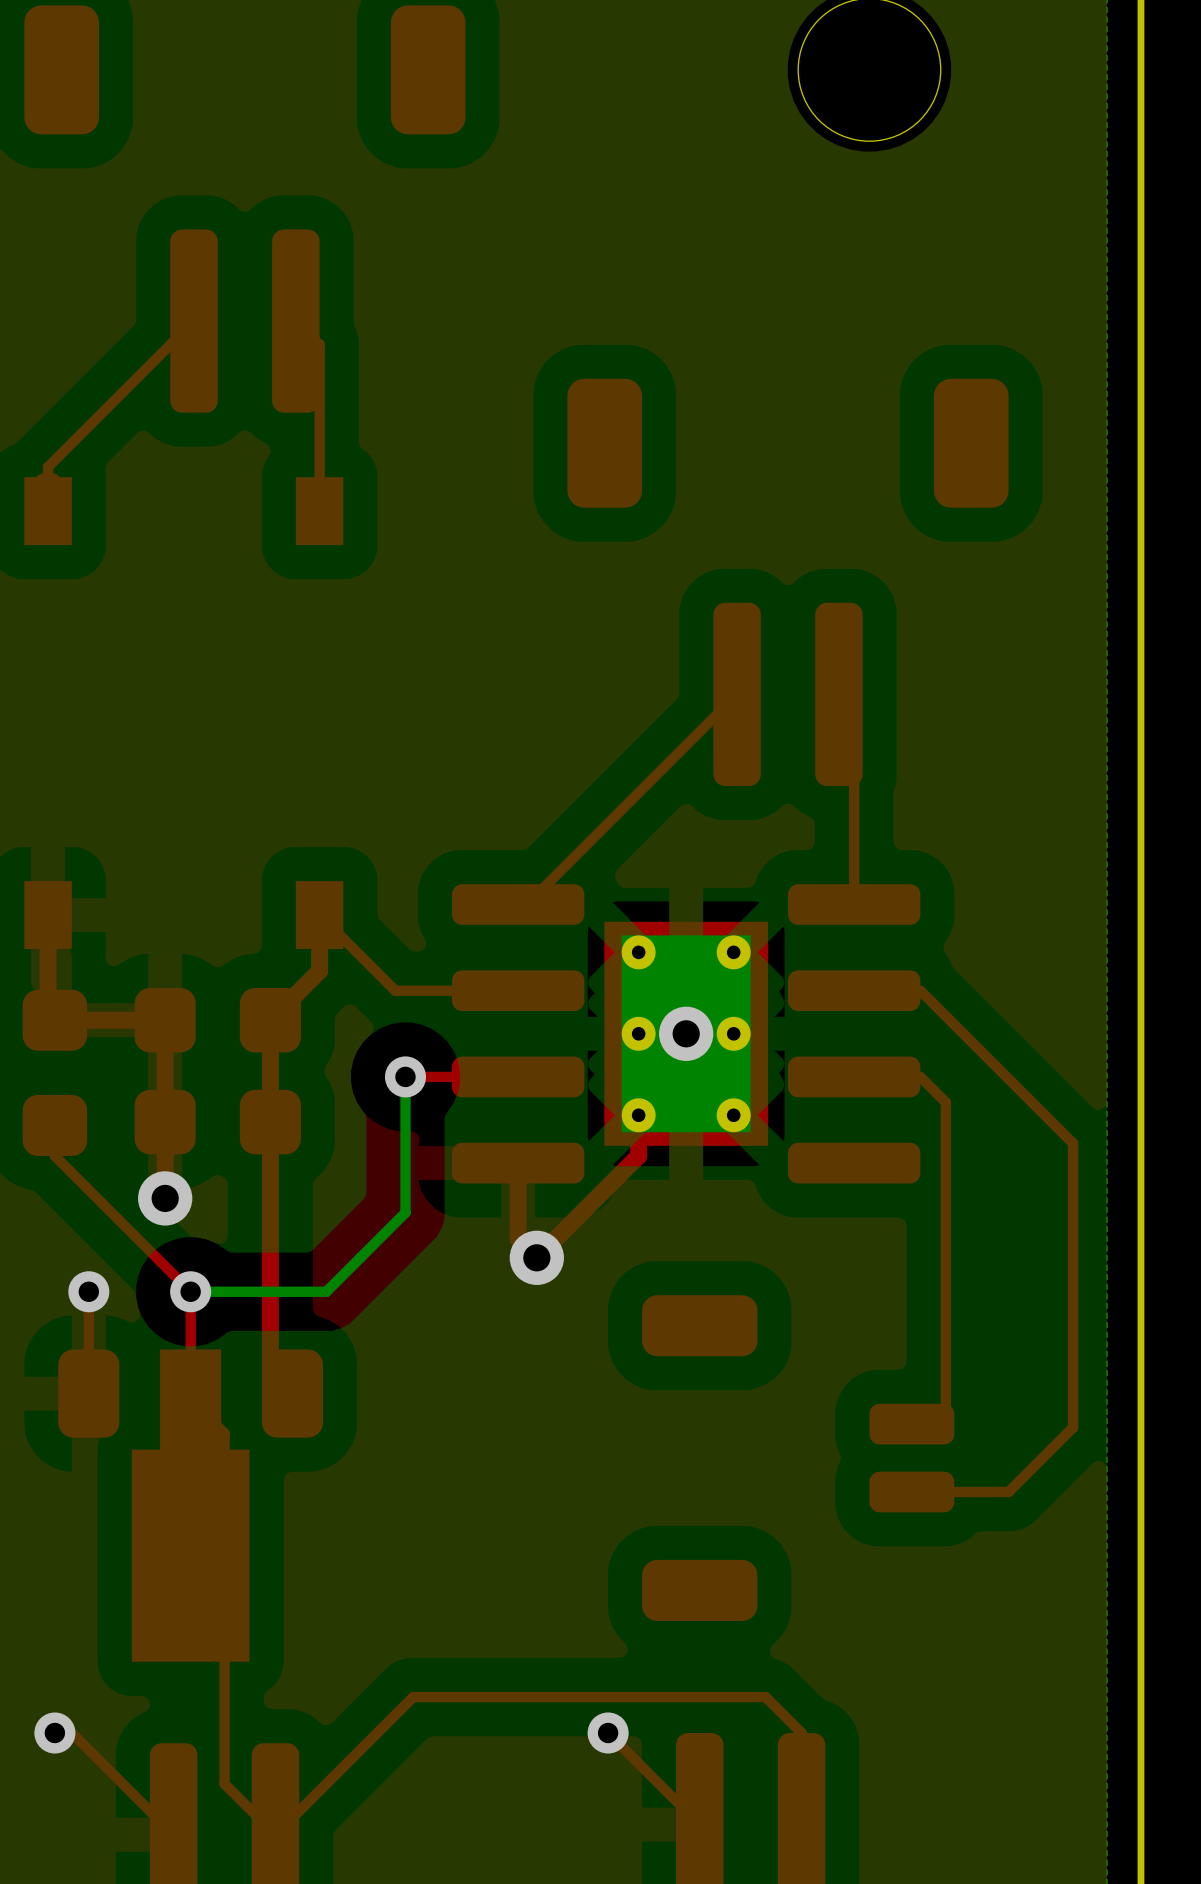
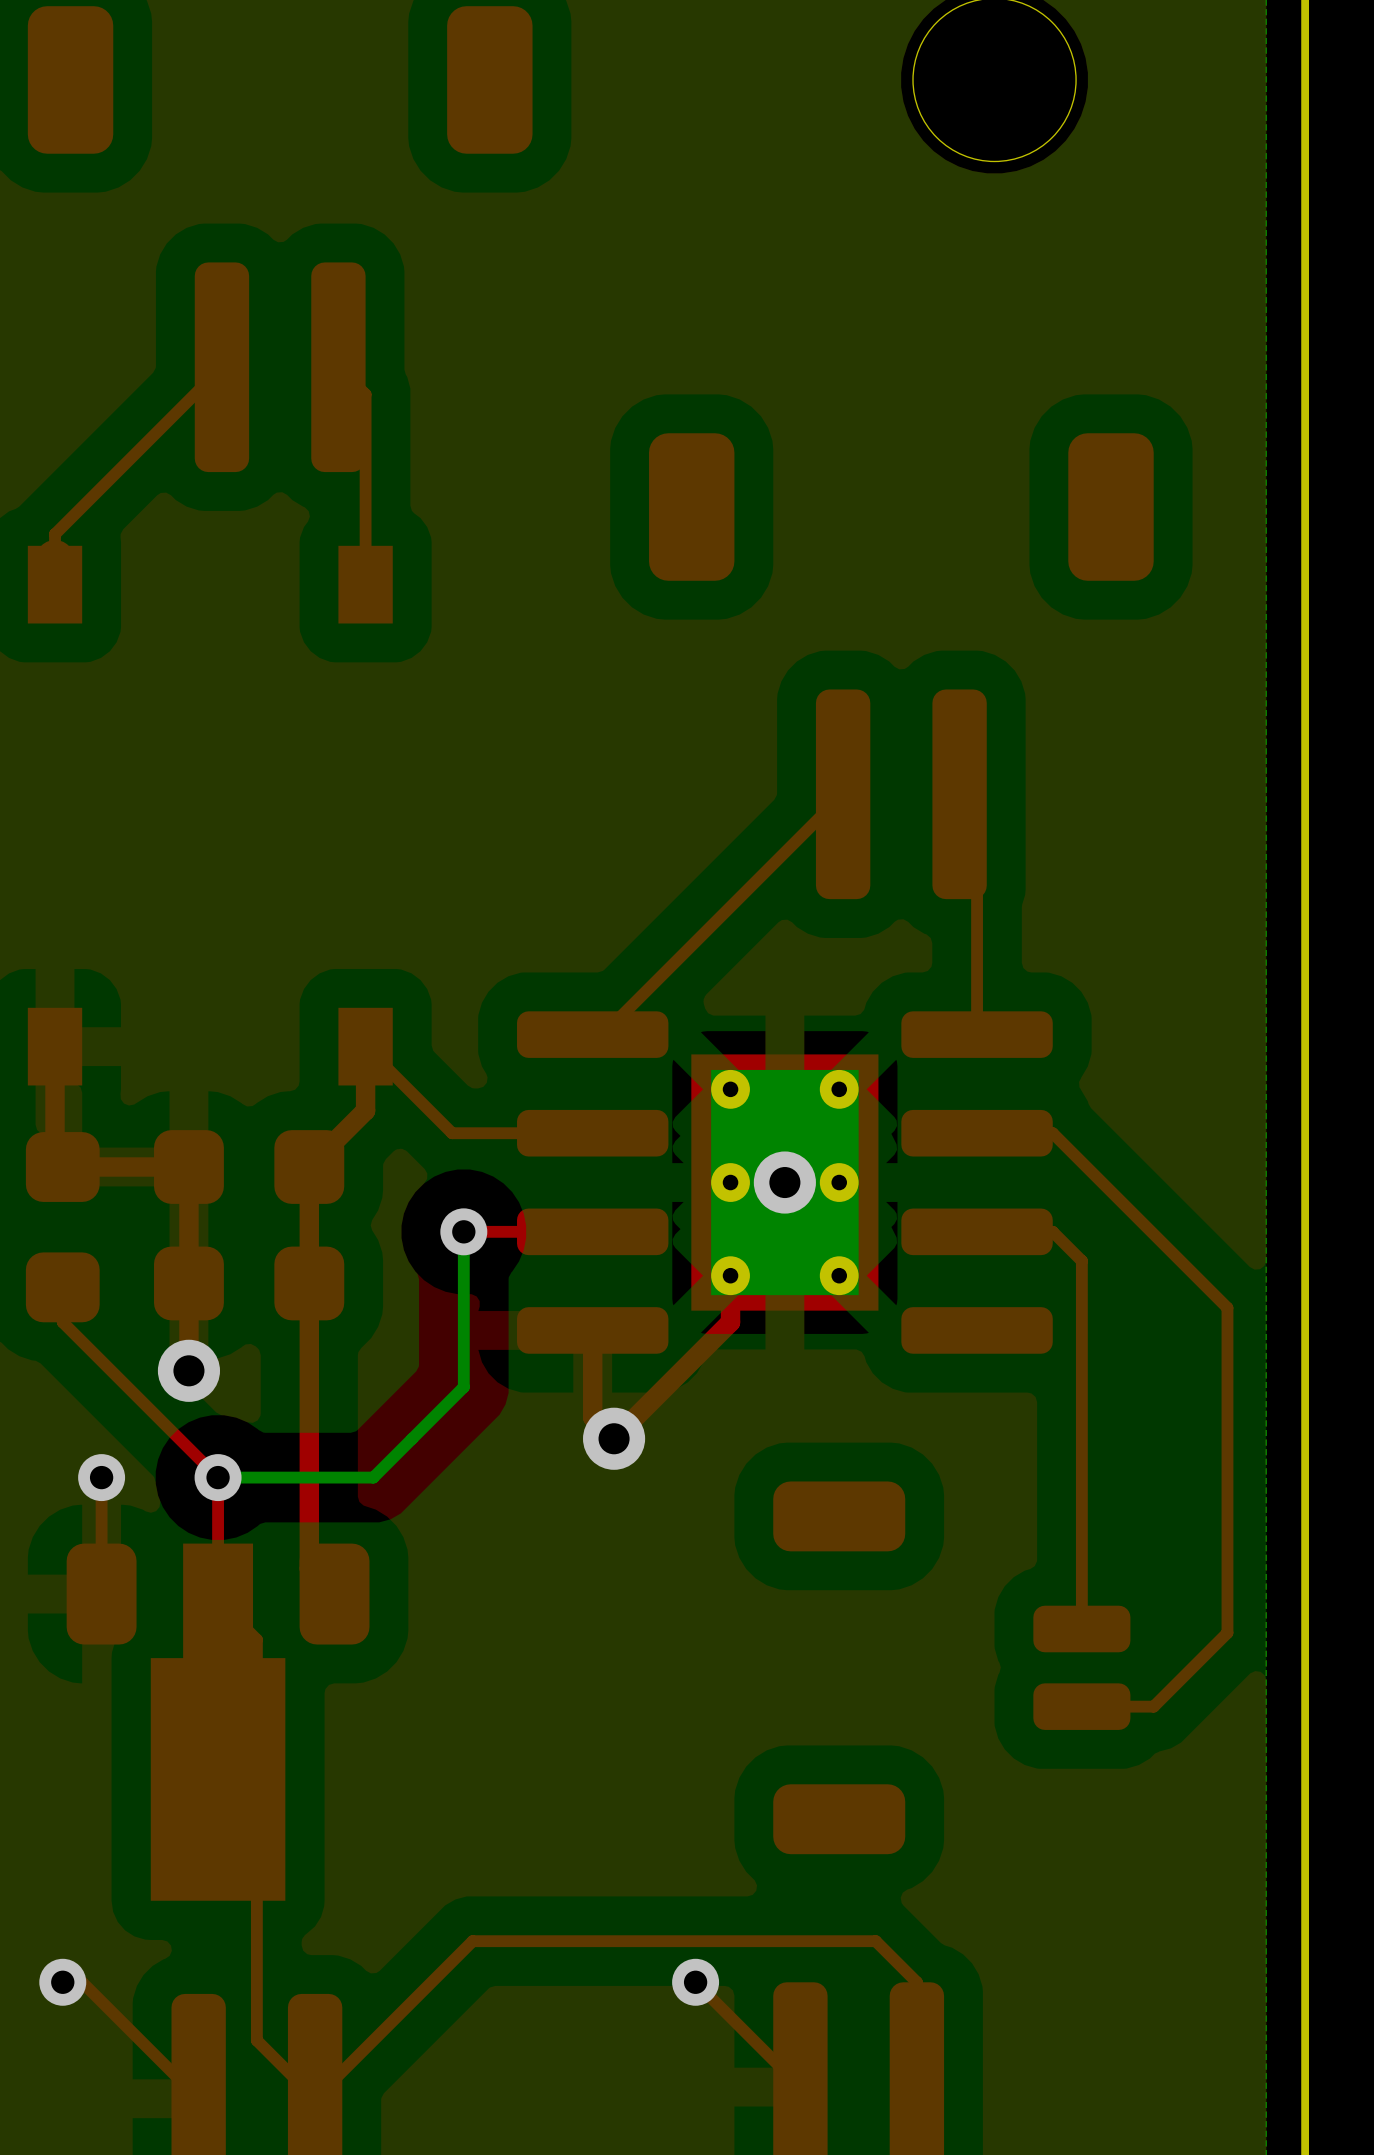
part position: (798, 1458) -> (951, 1667)

